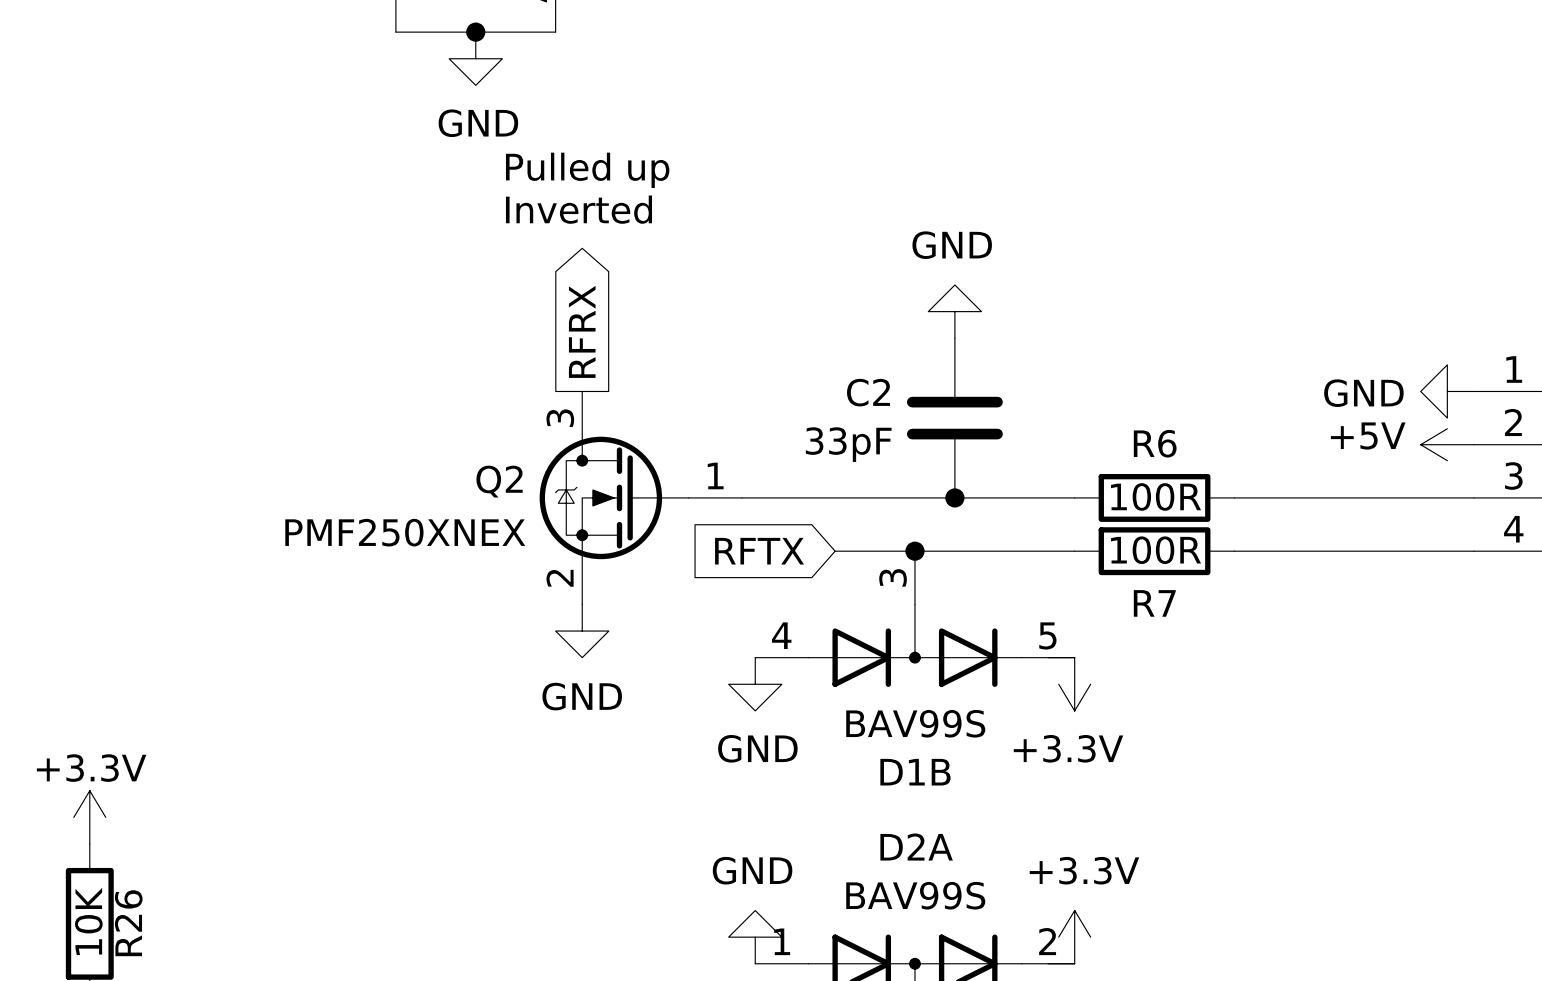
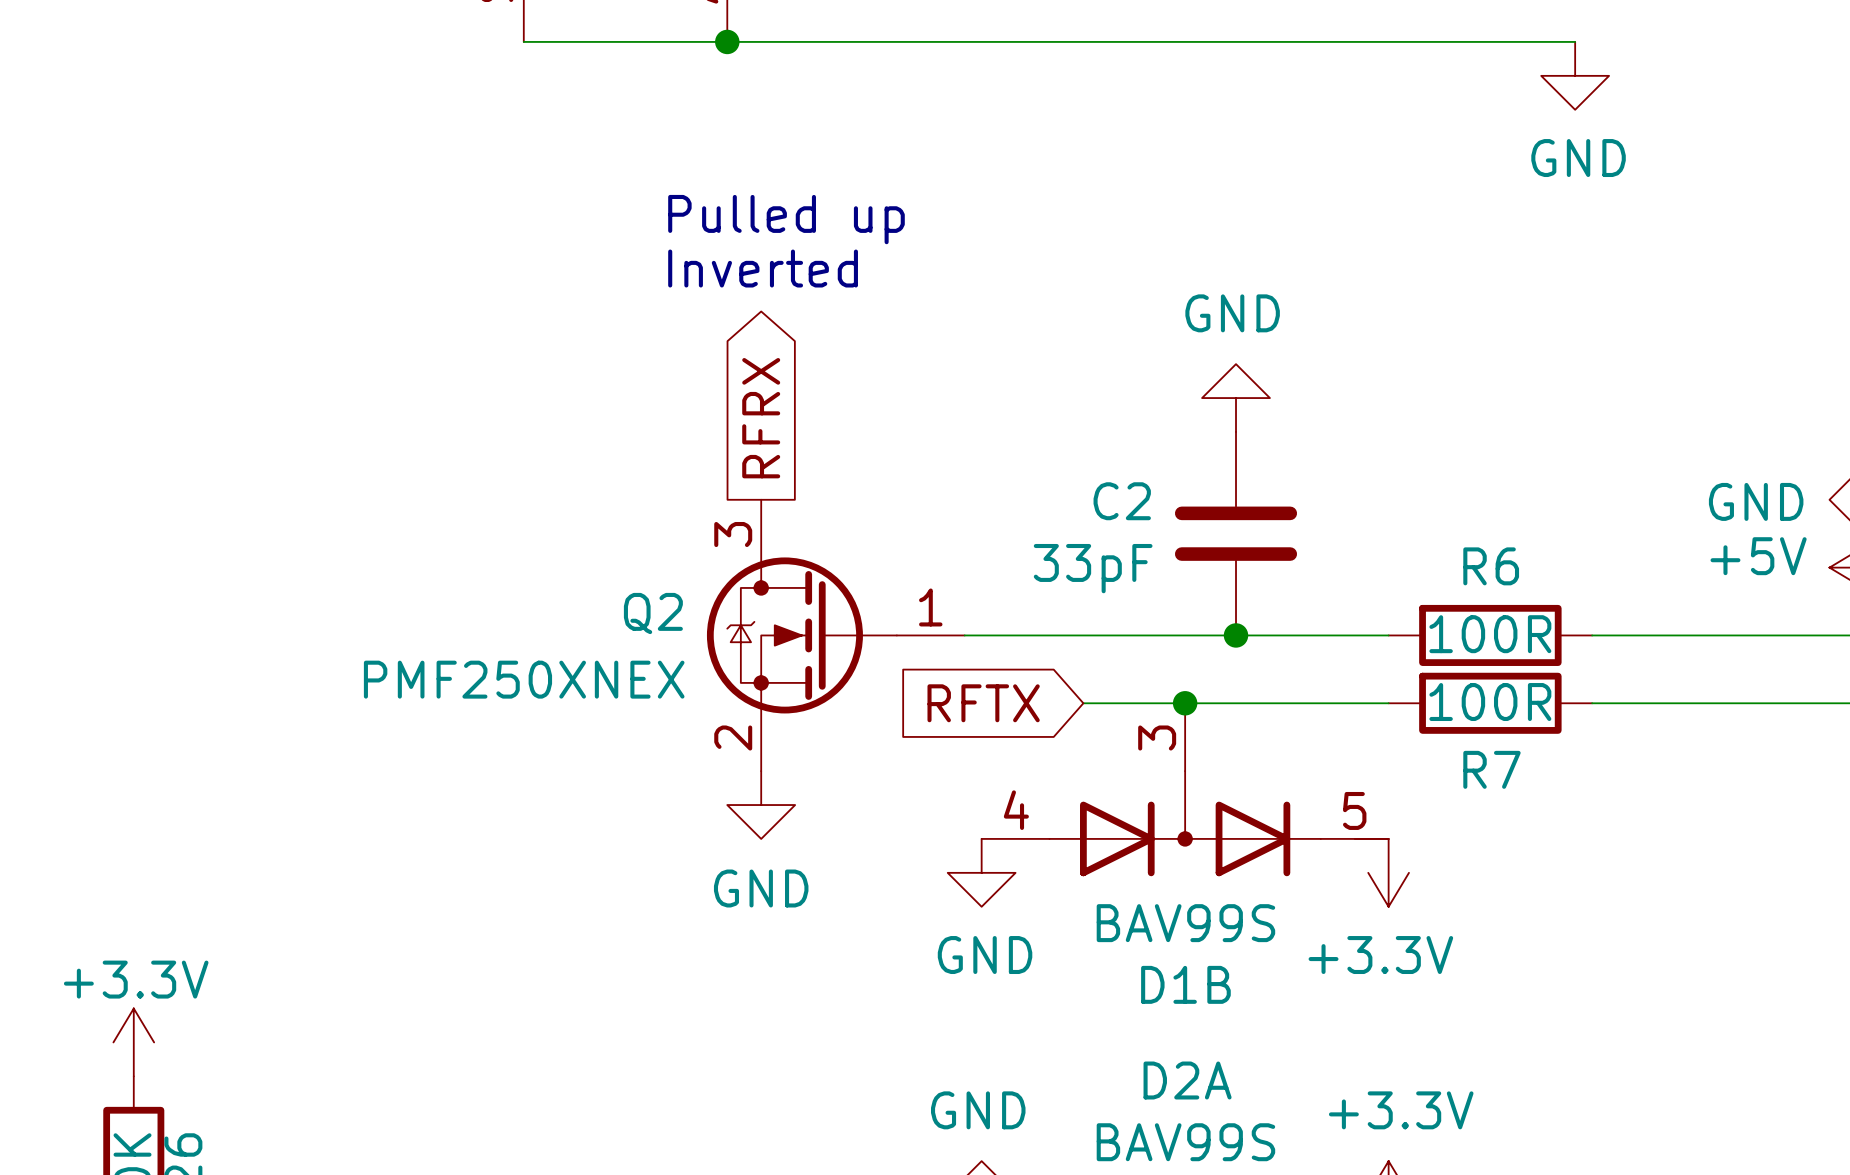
junction position: (475, 32) -> (727, 41)
wire: none -> (727, 41) (1575, 41)
power symbol: GND (475, 58) -> none
power symbol: none -> GND (1575, 75)

